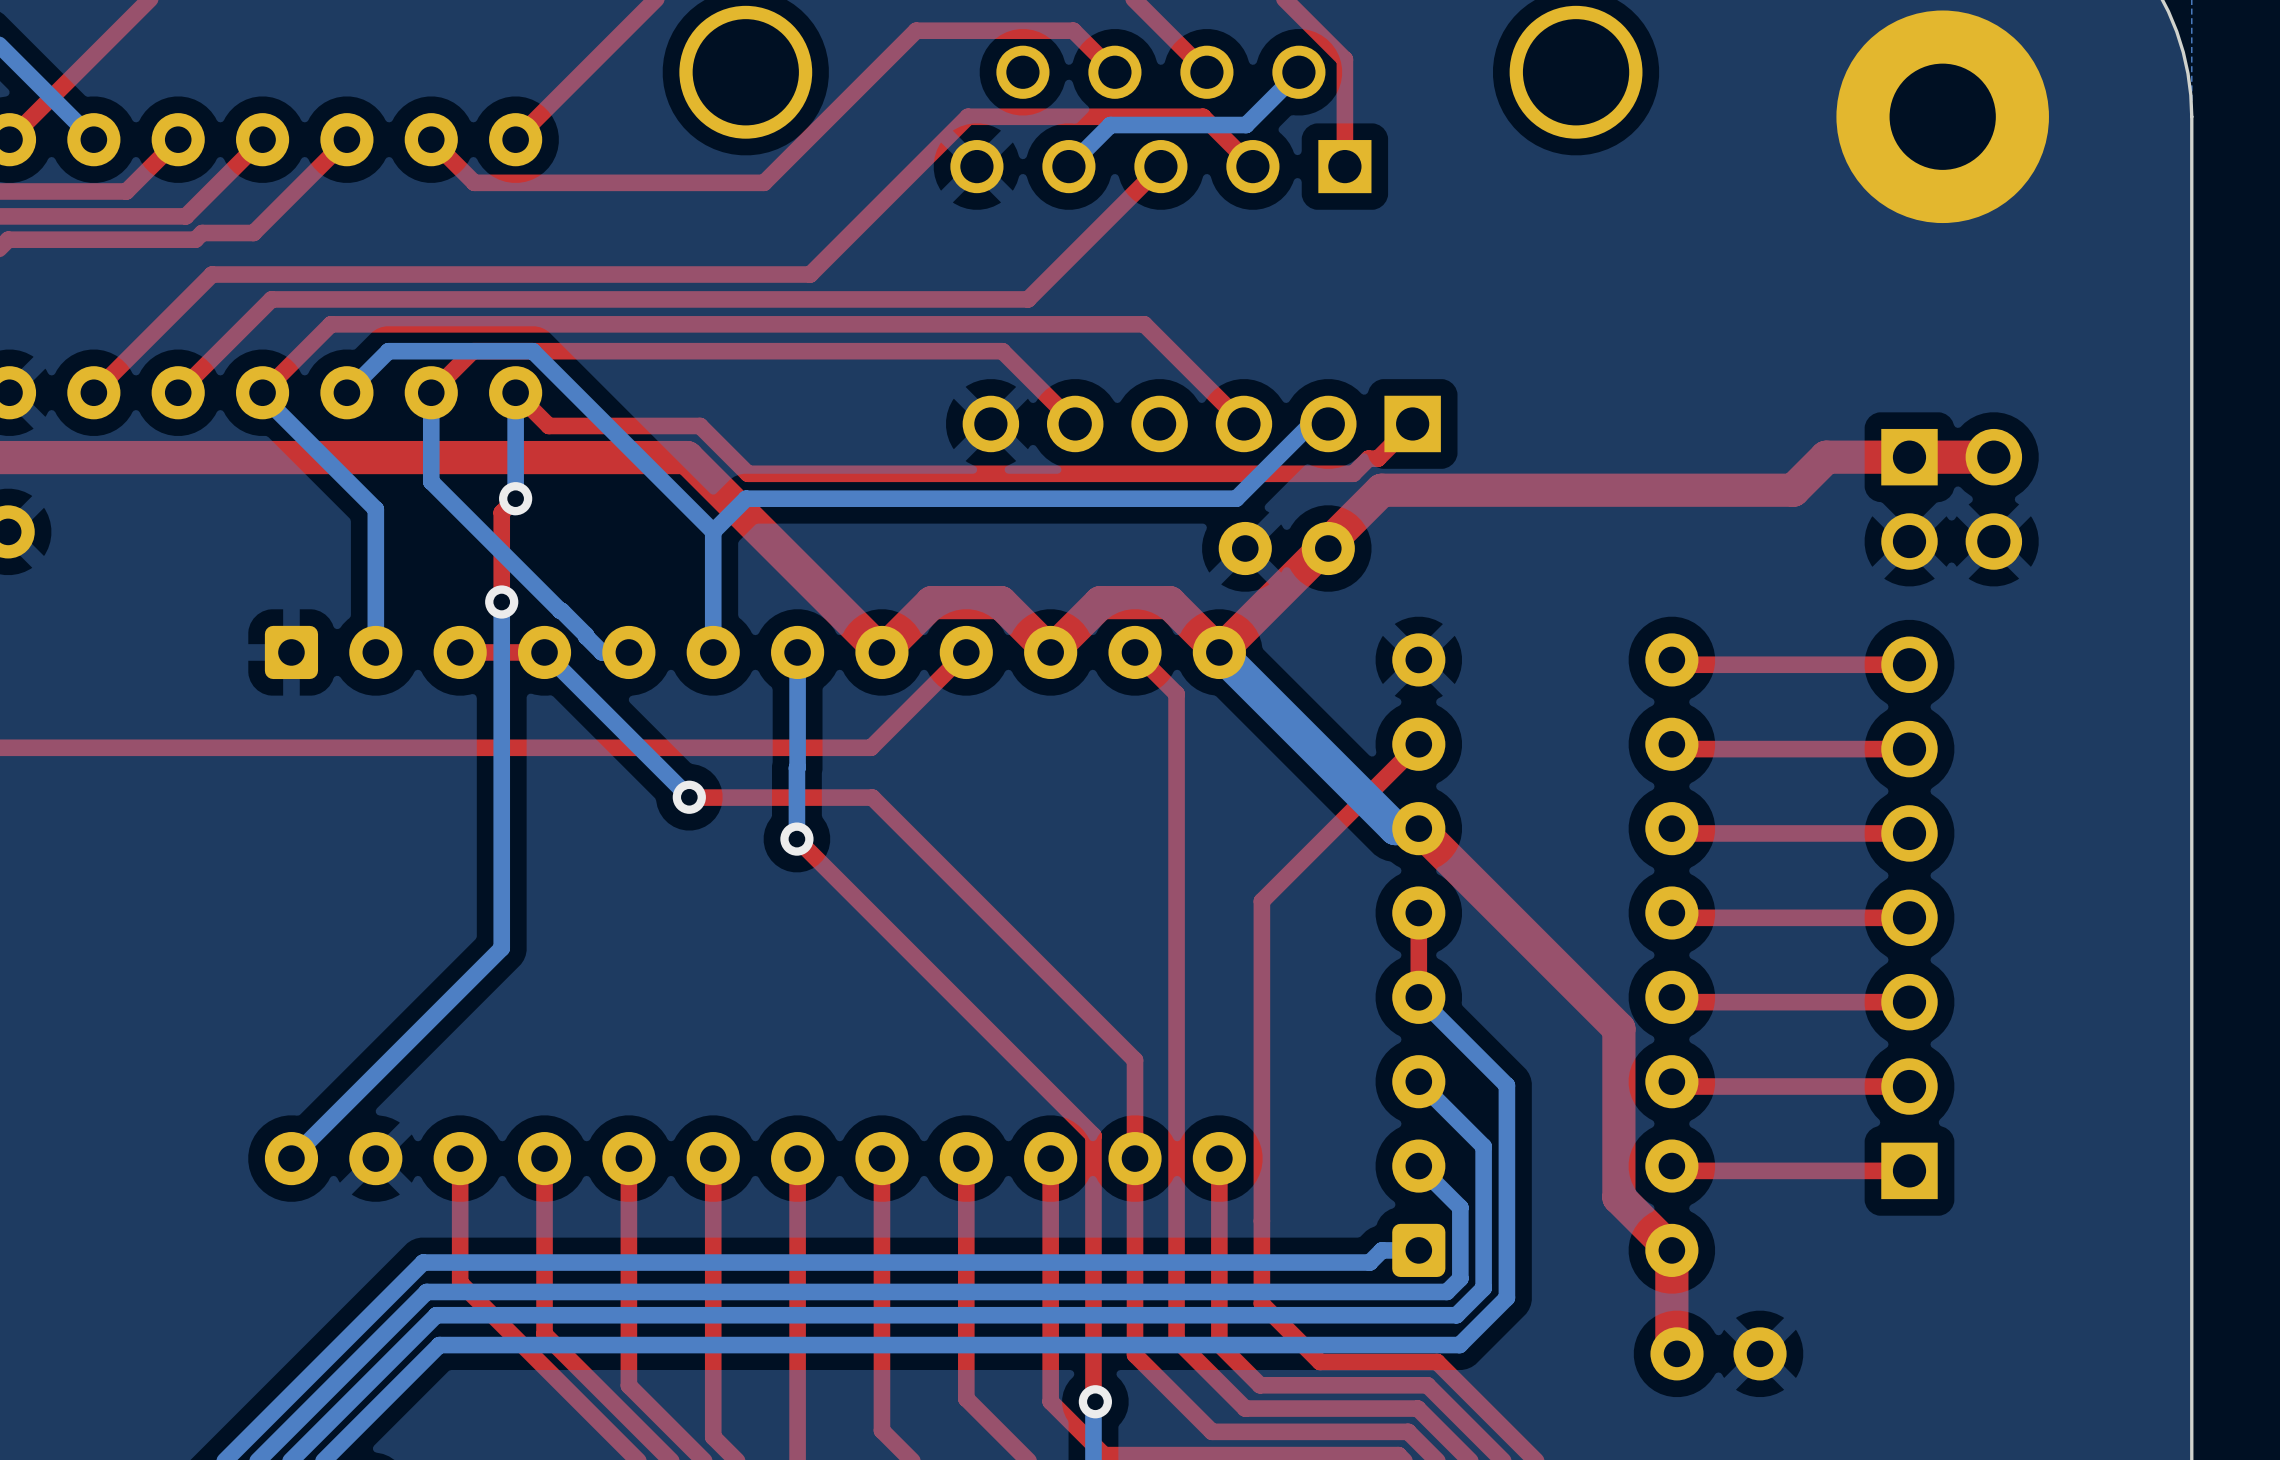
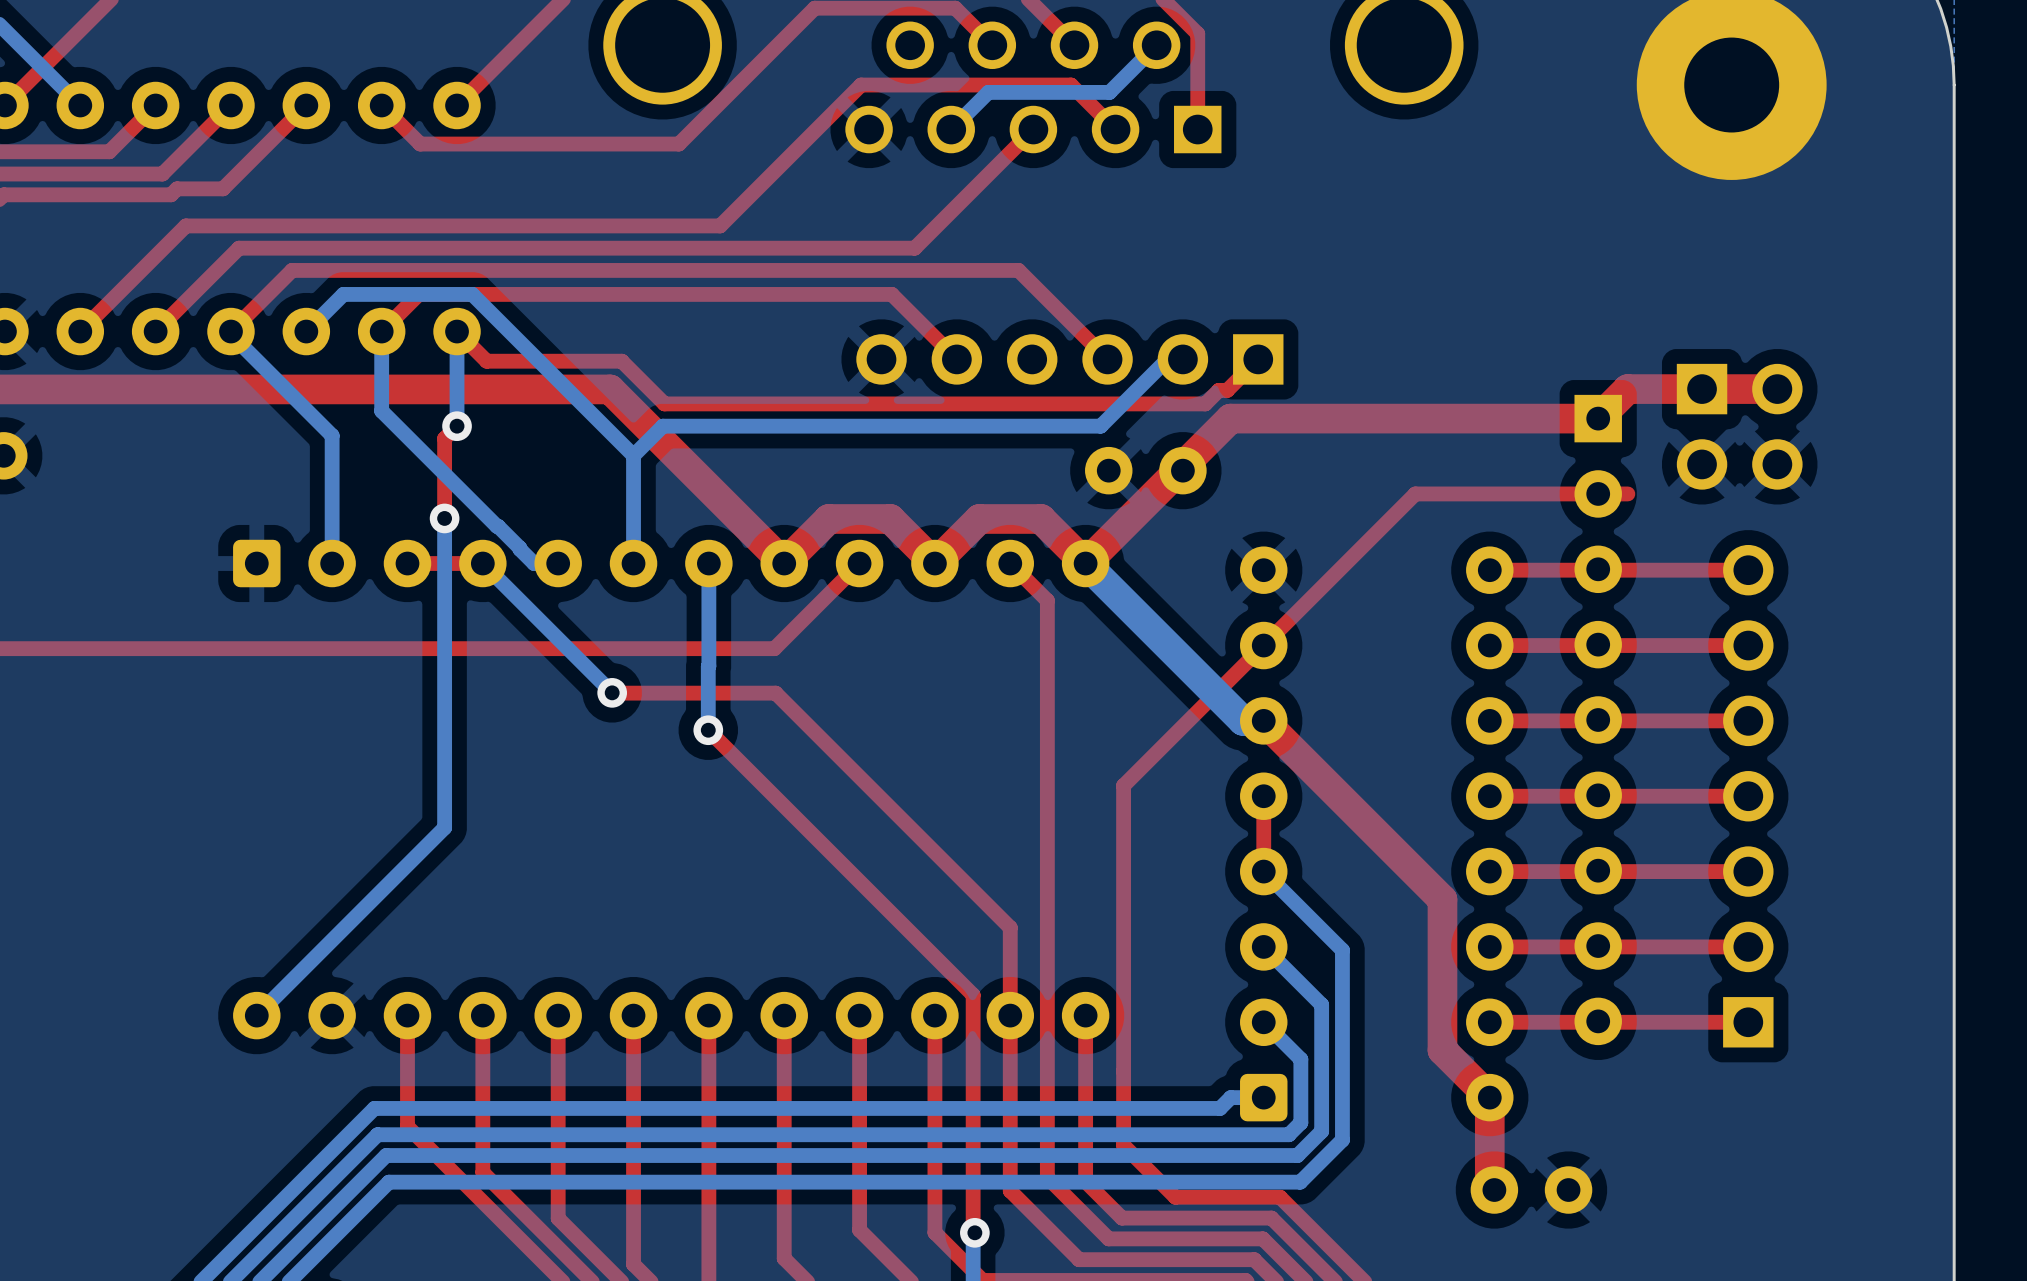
top track: none -> (1627, 493) (1415, 493) (1263, 645)
top track: (1671, 659) (1676, 664) (1909, 664) -> (1489, 570) (1748, 570)
top track: (1671, 744) (1676, 749) (1909, 749) -> (1489, 645) (1748, 645)
part: none -> (1598, 719)
top track: (1671, 828) (1676, 833) (1909, 833) -> (1489, 720) (1748, 720)
top track: (1671, 912) (1676, 917) (1909, 917) -> (1489, 796) (1748, 796)
part position: (1909, 917) -> (1748, 796)
top track: (1671, 997) (1676, 1002) (1909, 1002) -> (1489, 871) (1748, 871)
top track: (1671, 1081) (1676, 1086) (1909, 1086) -> (1489, 946) (1748, 946)
top track: (1671, 1166) (1676, 1170) (1909, 1170) -> (1489, 1022) (1748, 1022)

